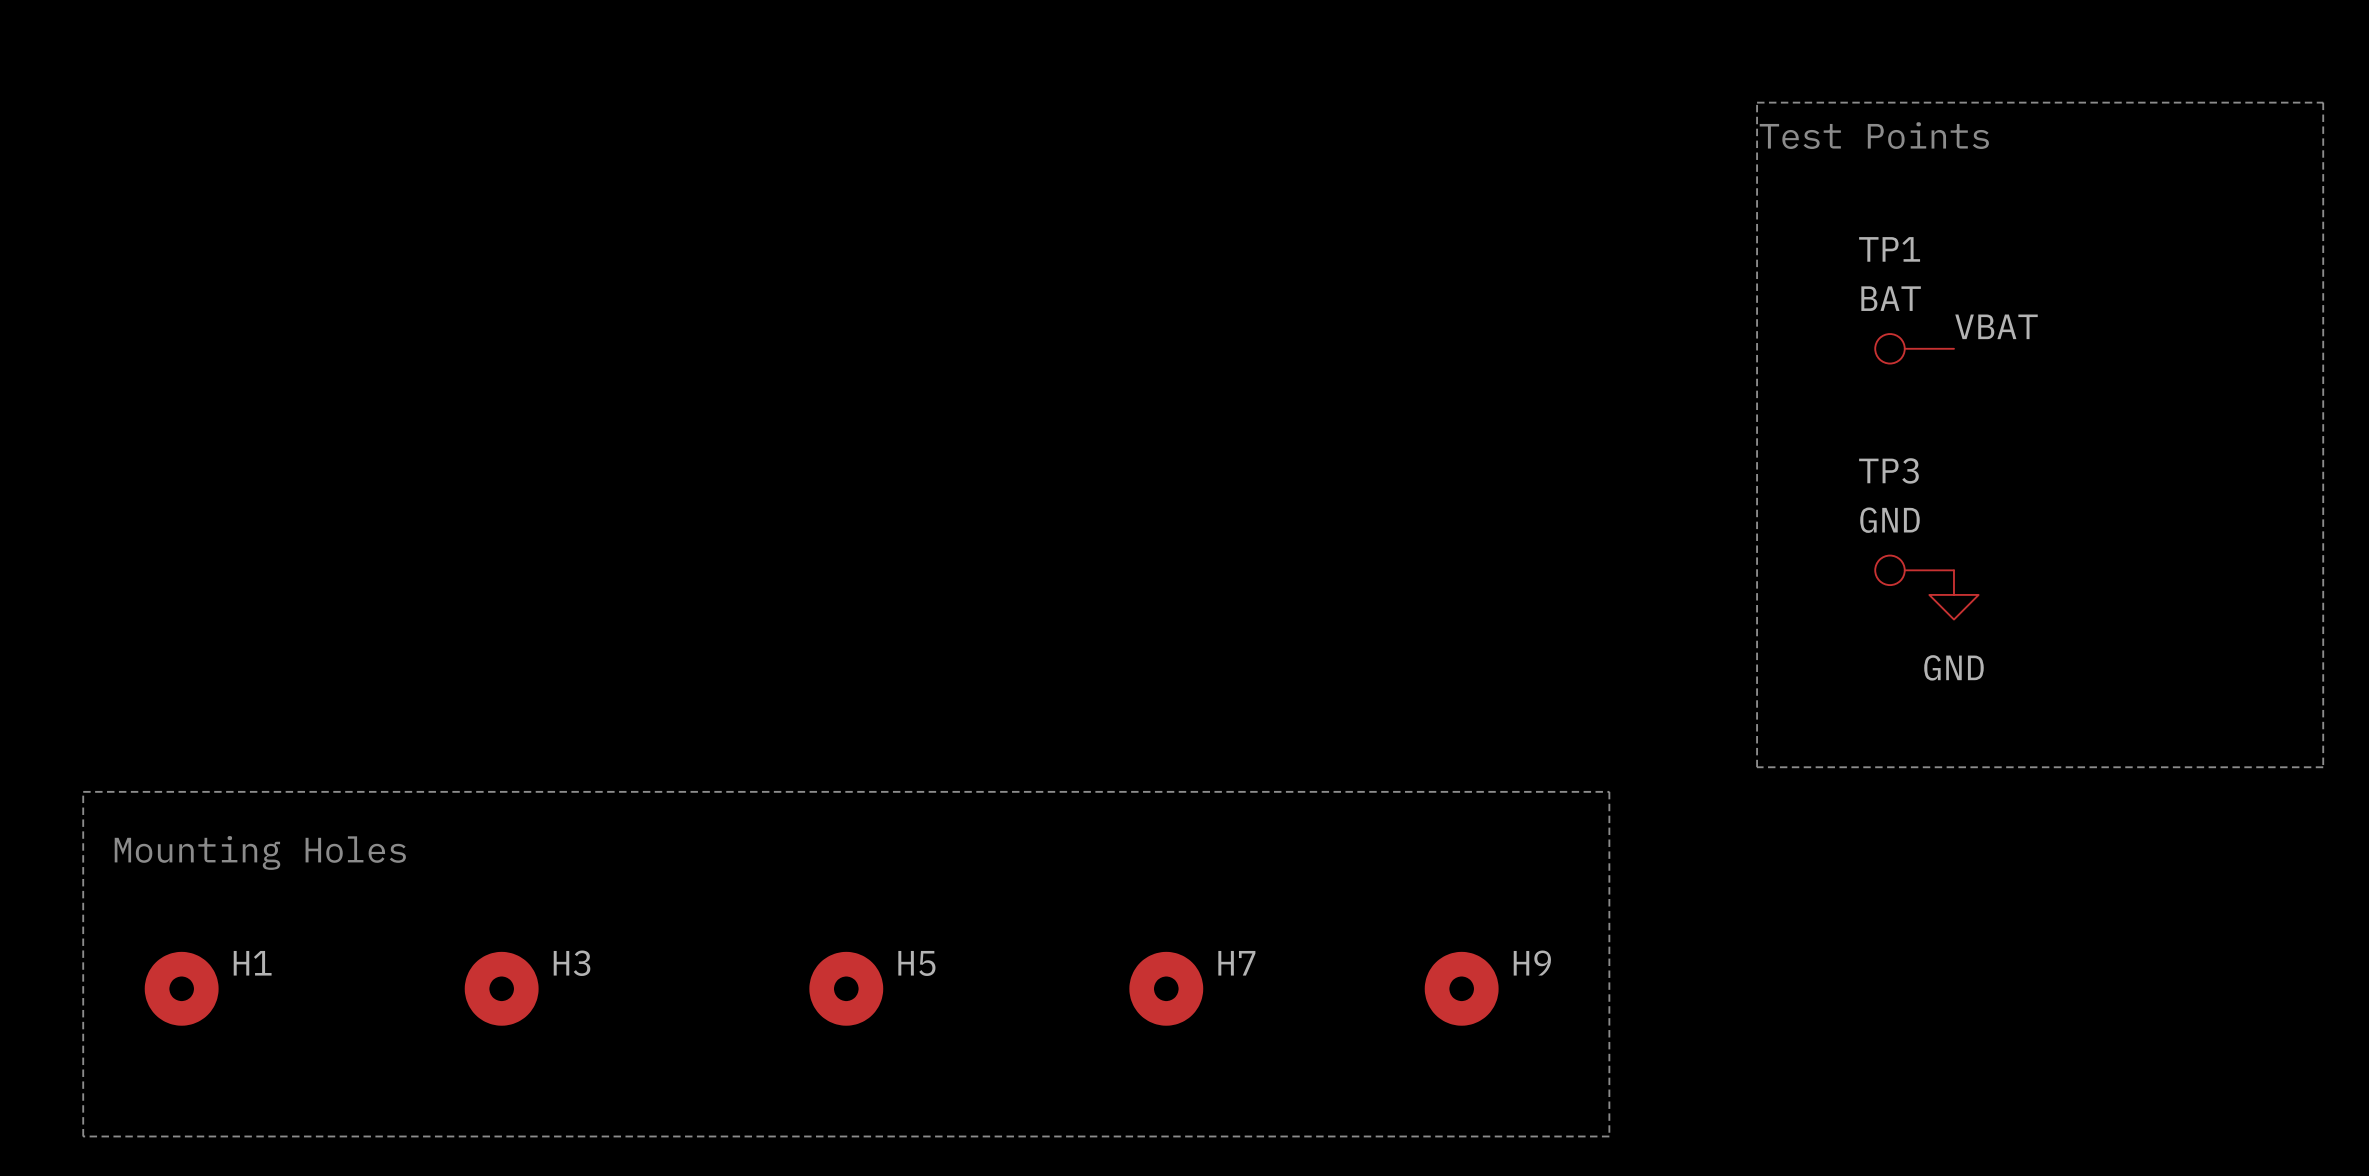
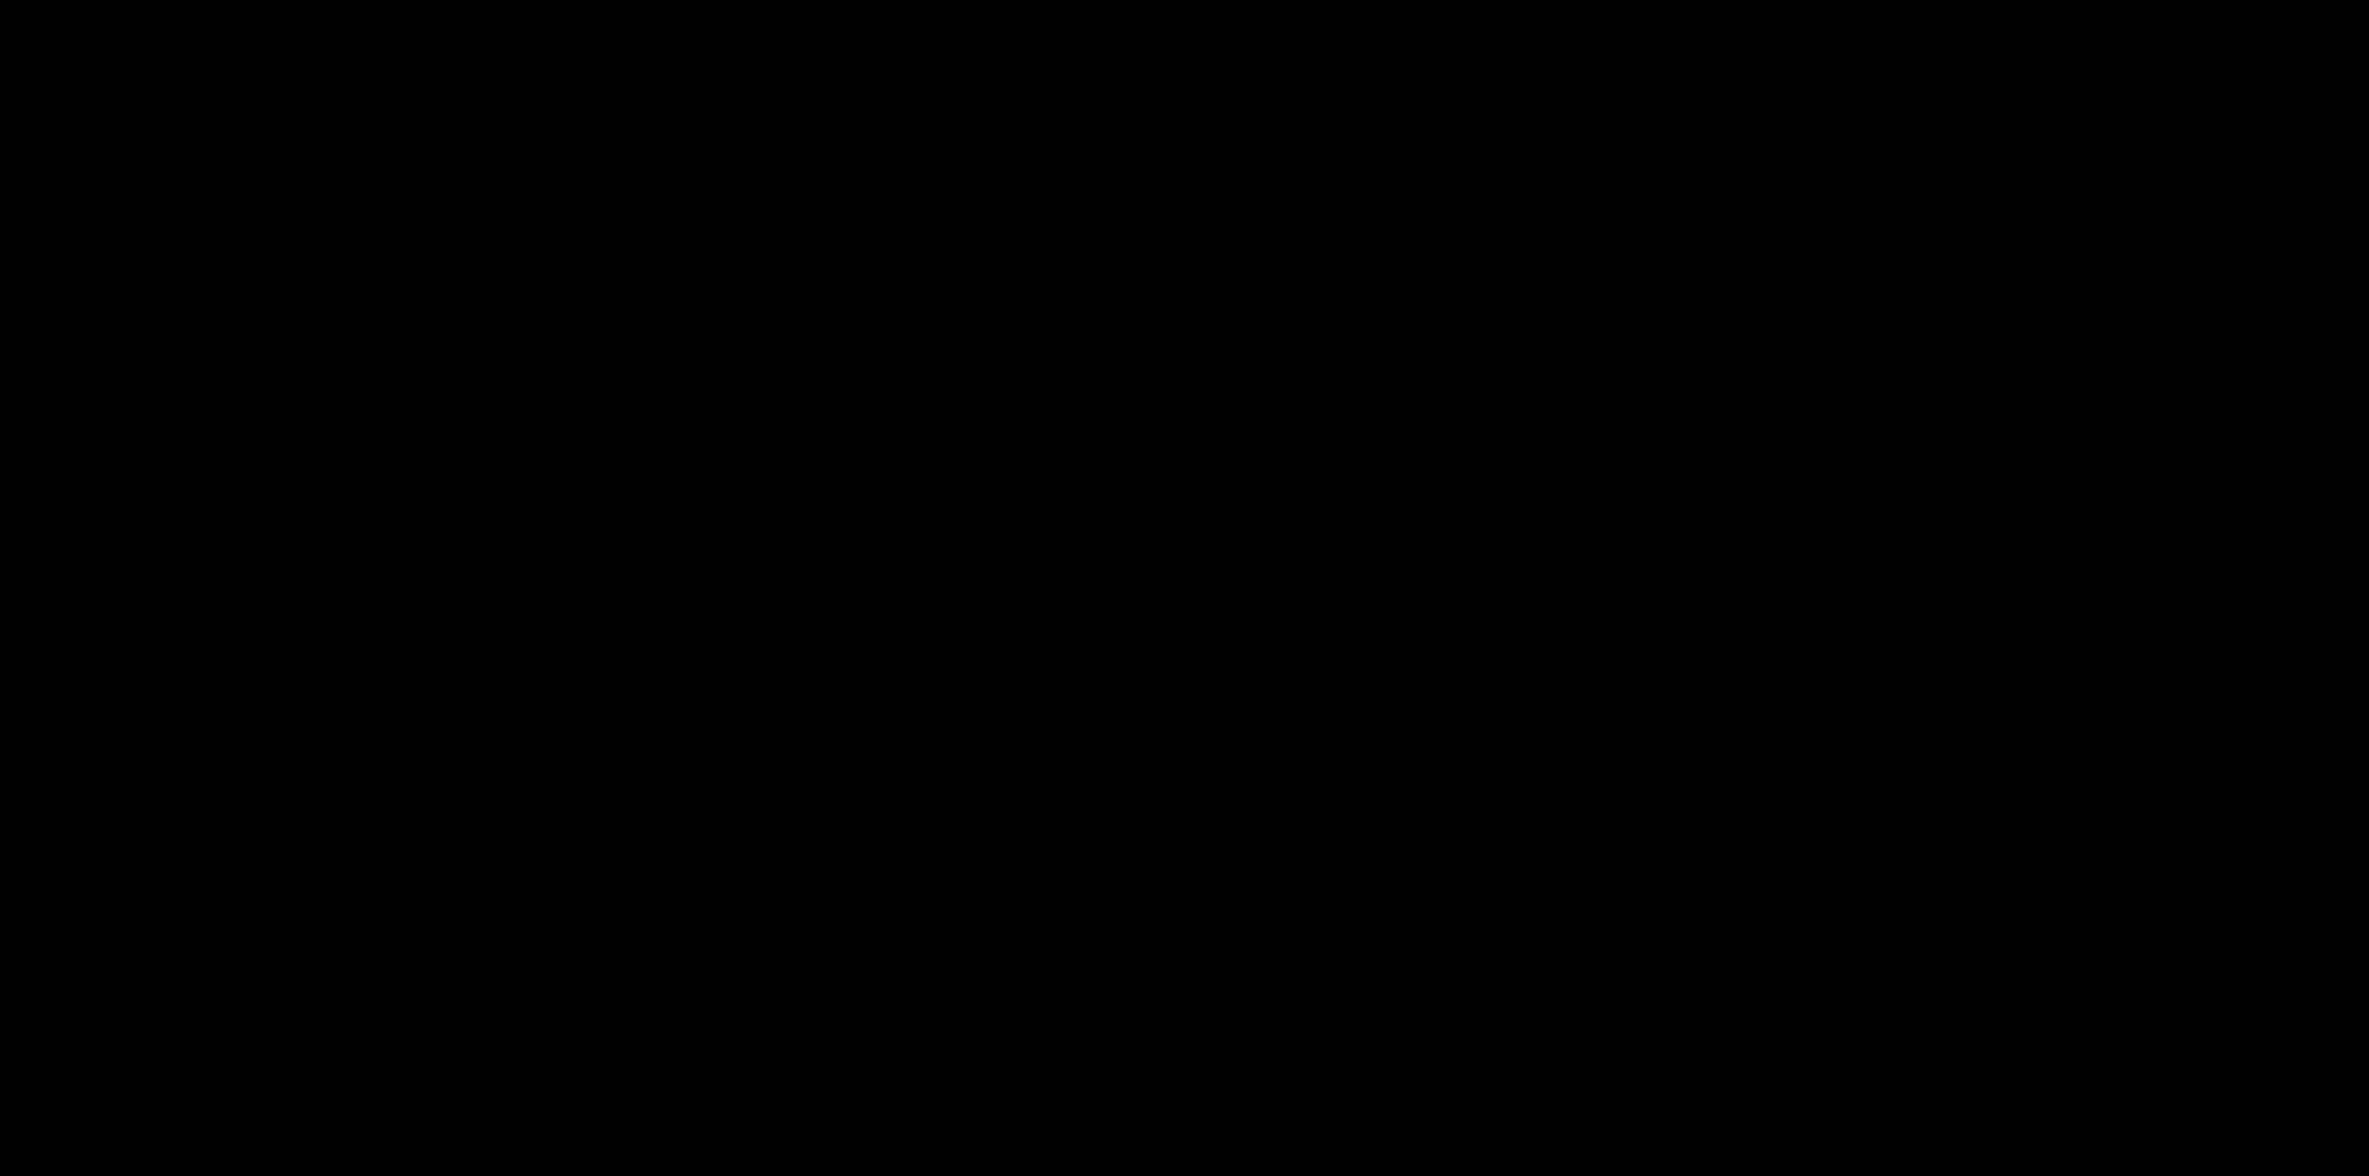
line: (1757, 102) (2323, 102) (2323, 767) (1757, 767) (1757, 102) -> none
text: Test Points (1874, 135) -> none
label: VBAT (1996, 326) -> none
TP1: BAT (1914, 348) -> none
TP3: GND (1914, 570) -> none
power symbol: GND (1953, 594) -> none
line: (83, 791) (1609, 791) (1609, 1136) (83, 1136) (83, 791) -> none
text: Mounting Holes (260, 852) -> none
H1: (181, 988) -> none
H3: (501, 988) -> none
H5: (846, 988) -> none
H7: (1166, 988) -> none
H9: (1461, 988) -> none

